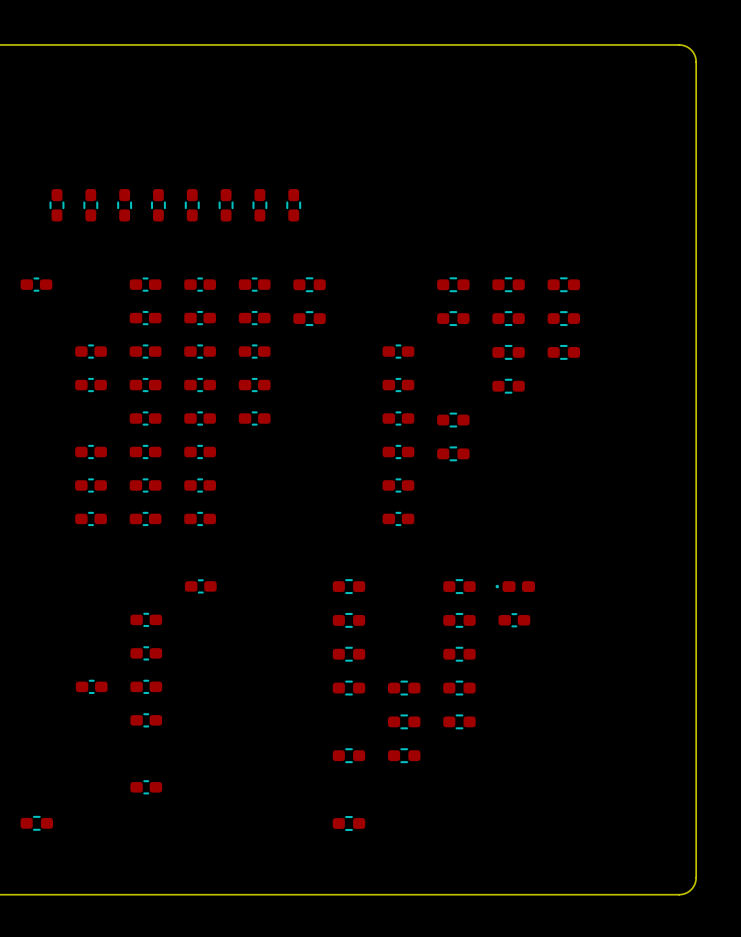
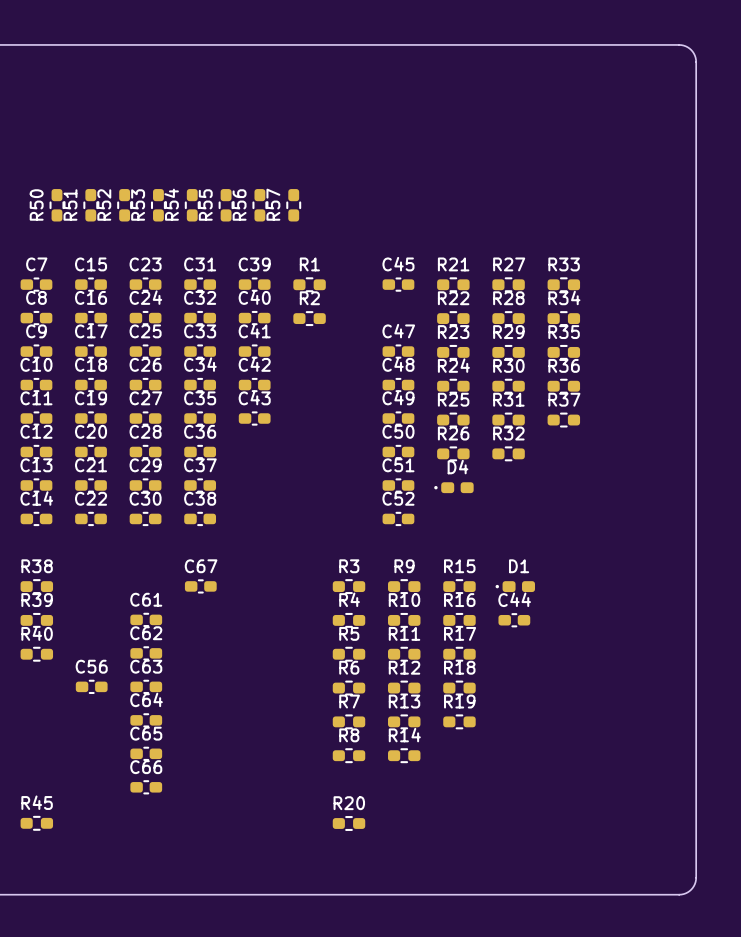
R50 name: none -> R50 (36, 204)
R51 name: none -> R51 (70, 204)
R52 name: none -> R52 (104, 204)
R53 name: none -> R53 (138, 204)
R54 name: none -> R54 (171, 204)
R55 name: none -> R55 (205, 204)
R56 name: none -> R56 (239, 204)
R57 name: none -> R57 (273, 204)
C7 name: none -> C7 (36, 264)
C23 name: none -> C23 (145, 264)
C31 name: none -> C31 (200, 264)
C39 name: none -> C39 (254, 264)
R1 name: none -> R1 (309, 264)
R21 name: none -> R21 (453, 264)
R27 name: none -> R27 (509, 264)
R33 name: none -> R33 (564, 264)
C15: none -> (91, 284)
C45: none -> (398, 284)
C24 name: none -> C24 (145, 297)
C32 name: none -> C32 (200, 297)
C40 name: none -> C40 (254, 297)
R34 name: none -> R34 (564, 297)
R2 name: none -> R2 (309, 298)
R22 name: none -> R22 (453, 298)
R28 name: none -> R28 (508, 298)
C8: none -> (36, 318)
C16: none -> (91, 318)
C17 name: none -> C17 (91, 331)
C25 name: none -> C25 (145, 331)
C33 name: none -> C33 (200, 331)
C41 name: none -> C41 (254, 331)
C47 name: none -> C47 (398, 331)
R29 name: none -> R29 (508, 332)
R35 name: none -> R35 (564, 332)
C9: none -> (36, 351)
R23: none -> (453, 352)
C18 name: none -> C18 (91, 364)
C26 name: none -> C26 (145, 364)
C34 name: none -> C34 (200, 364)
C42 name: none -> C42 (254, 364)
C48 name: none -> C48 (398, 364)
R30 name: none -> R30 (508, 365)
C10: none -> (36, 385)
R24: none -> (453, 386)
R36: none -> (563, 386)
C27 name: none -> C27 (145, 398)
C35 name: none -> C35 (200, 398)
C43 name: none -> C43 (254, 398)
C49 name: none -> C49 (398, 398)
R25 name: none -> R25 (453, 399)
C11: none -> (36, 418)
C19: none -> (91, 418)
R31: none -> (508, 420)
R37: none -> (563, 420)
C20 name: none -> C20 (91, 431)
C28 name: none -> C28 (145, 431)
C36 name: none -> C36 (200, 431)
C50 name: none -> C50 (398, 431)
R26 name: none -> R26 (453, 433)
C12: none -> (36, 451)
R32: none -> (508, 453)
C21 name: none -> C21 (91, 465)
C29 name: none -> C29 (145, 465)
C37 name: none -> C37 (200, 465)
C51 name: none -> C51 (398, 465)
C13: none -> (36, 485)
D4: none -> (453, 487)
C22 name: none -> C22 (91, 498)
C30 name: none -> C30 (145, 498)
C38 name: none -> C38 (200, 498)
C52 name: none -> C52 (398, 498)
C14: none -> (36, 518)
C67 name: none -> C67 (201, 566)
R3 name: none -> R3 (349, 566)
R15 name: none -> R15 (459, 566)
D1 name: none -> D1 (519, 566)
R38: none -> (36, 586)
R9: none -> (404, 586)
C61 name: none -> C61 (146, 599)
R4 name: none -> R4 (349, 599)
C44 name: none -> C44 (514, 599)
R16 name: none -> R16 (459, 600)
R39: none -> (36, 620)
R10: none -> (404, 620)
C62 name: none -> C62 (146, 633)
R5 name: none -> R5 (349, 633)
R17 name: none -> R17 (460, 633)
R40: none -> (36, 654)
R11: none -> (404, 654)
C56 name: none -> C56 (91, 666)
C63 name: none -> C63 (146, 666)
R6 name: none -> R6 (349, 667)
R12 name: none -> R12 (404, 667)
R18 name: none -> R18 (459, 667)
C64 name: none -> C64 (146, 699)
R13 name: none -> R13 (404, 701)
R19 name: none -> R19 (459, 701)
R7: none -> (349, 721)
R8 name: none -> R8 (349, 735)
R14 name: none -> R14 (404, 735)
C65: none -> (146, 753)
C66 name: none -> C66 (146, 767)
R45 name: none -> R45 (37, 802)
R20 name: none -> R20 (349, 803)

